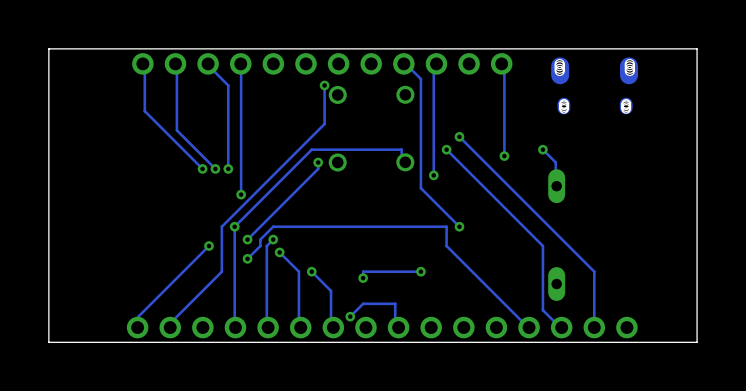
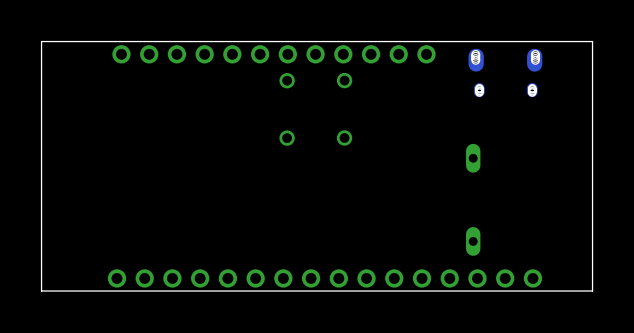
track: (142, 63) (144, 66) (144, 111) (202, 168) -> none
track: (175, 63) (176, 130) (215, 168) -> none
track: (208, 63) (228, 85) (228, 168) -> none
track: (240, 63) (241, 194) -> none
track: (403, 63) (420, 79) (420, 188) (459, 226) -> none
track: (436, 63) (433, 66) (433, 175) -> none
track: (501, 63) (504, 66) (504, 156) -> none
track: (324, 85) (324, 124) (221, 226) (221, 271) (170, 323) (170, 327) -> none
via: (324, 85) -> none
track: (459, 136) (594, 271) (594, 327) -> none
via: (459, 136) -> none
track: (446, 149) (542, 246) (542, 310) (561, 327) -> none
via: (446, 149) -> none
track: (542, 149) (555, 162) (556, 186) -> none
via: (542, 149) -> none
via: (504, 156) -> none
track: (318, 162) (318, 168) (247, 239) -> none
via: (318, 162) -> none
track: (405, 162) (401, 156) (401, 149) (311, 149) (234, 226) (235, 327) -> none
via: (202, 168) -> none
via: (215, 168) -> none
via: (228, 168) -> none
via: (433, 175) -> none
via: (241, 194) -> none
via: (234, 226) -> none
via: (459, 226) -> none
via: (247, 239) -> none
track: (273, 239) (266, 246) (268, 327) -> none
via: (273, 239) -> none
track: (209, 246) (138, 316) (137, 327) -> none
via: (209, 246) -> none
track: (279, 252) (298, 271) (298, 323) (300, 327) -> none
via: (279, 252) -> none
track: (247, 258) (260, 246) (260, 239) (273, 226) (446, 226) (446, 246) (529, 327) -> none
via: (247, 258) -> none
track: (311, 271) (331, 290) (331, 323) (333, 327) -> none
via: (311, 271) -> none
track: (420, 271) (363, 271) (363, 278) -> none
via: (420, 271) -> none
via: (363, 278) -> none
track: (350, 316) (363, 303) (395, 303) (395, 323) (398, 327) -> none
via: (350, 316) -> none

